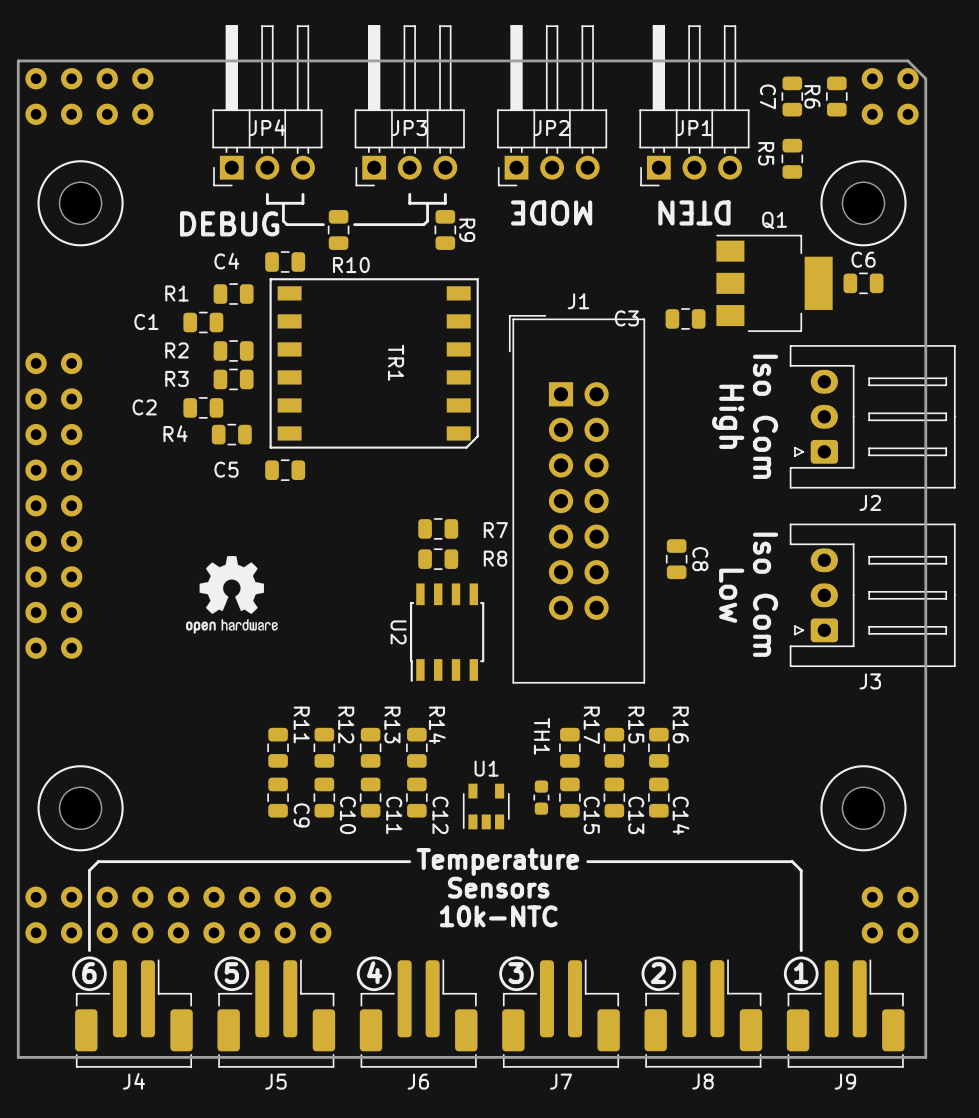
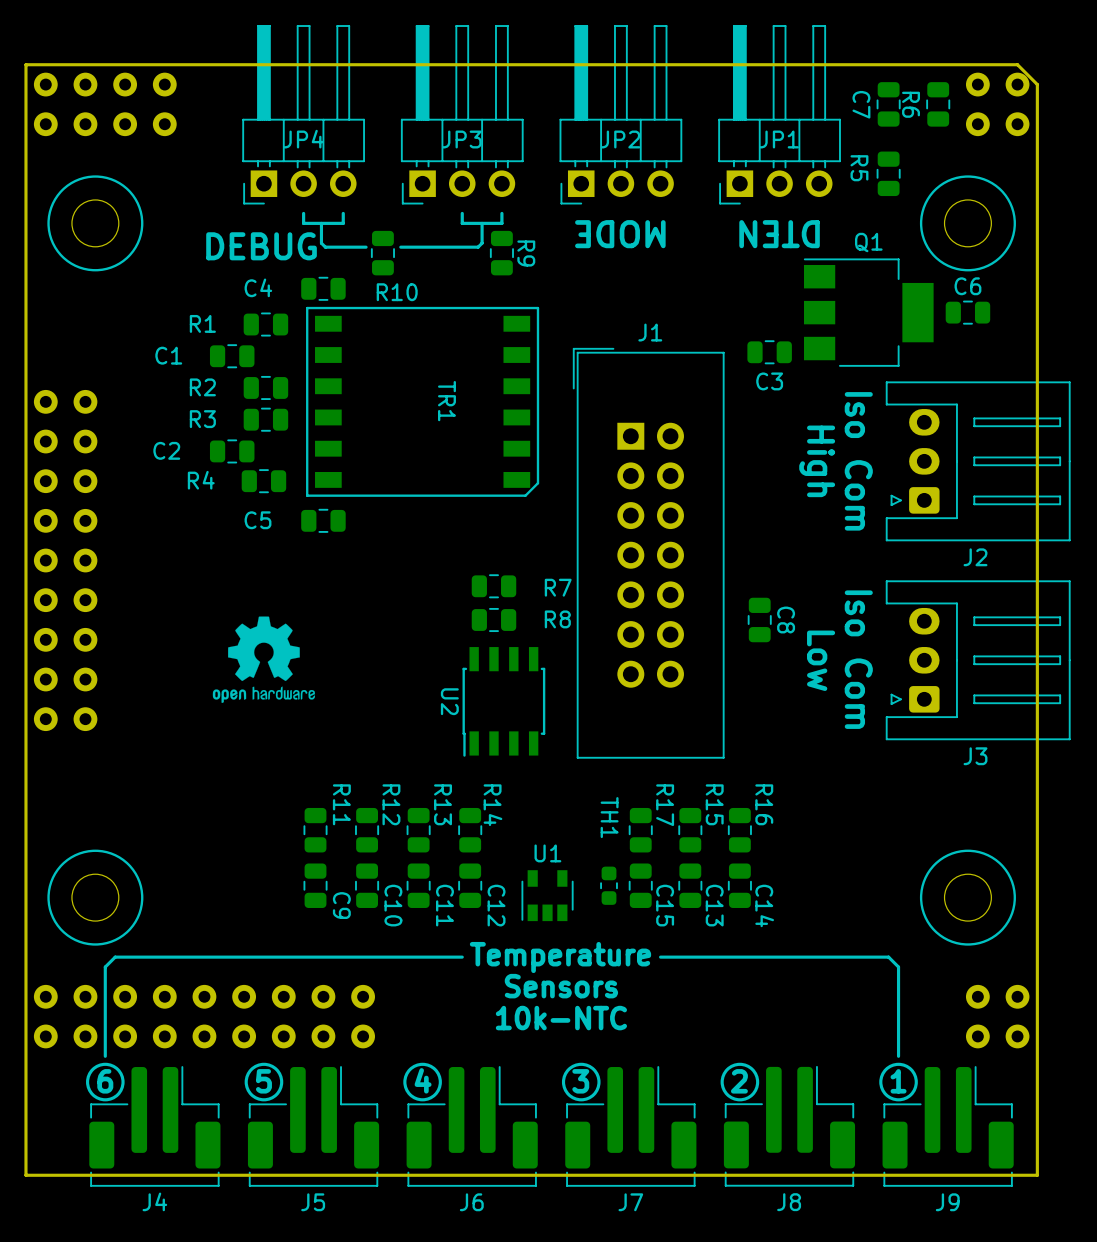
C3 name position: C3 (626, 318) -> C3 (769, 381)

